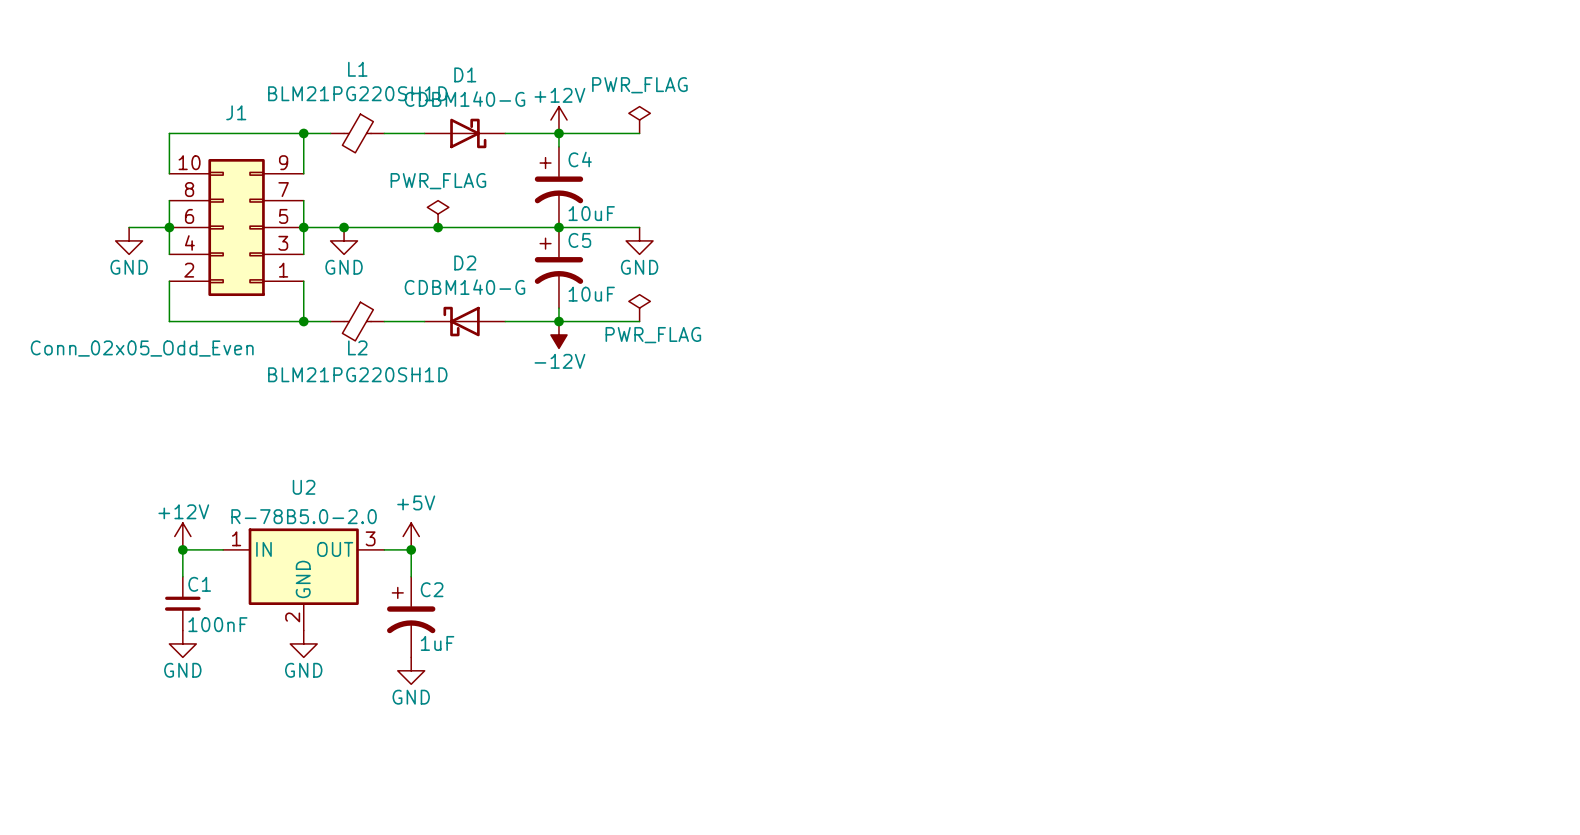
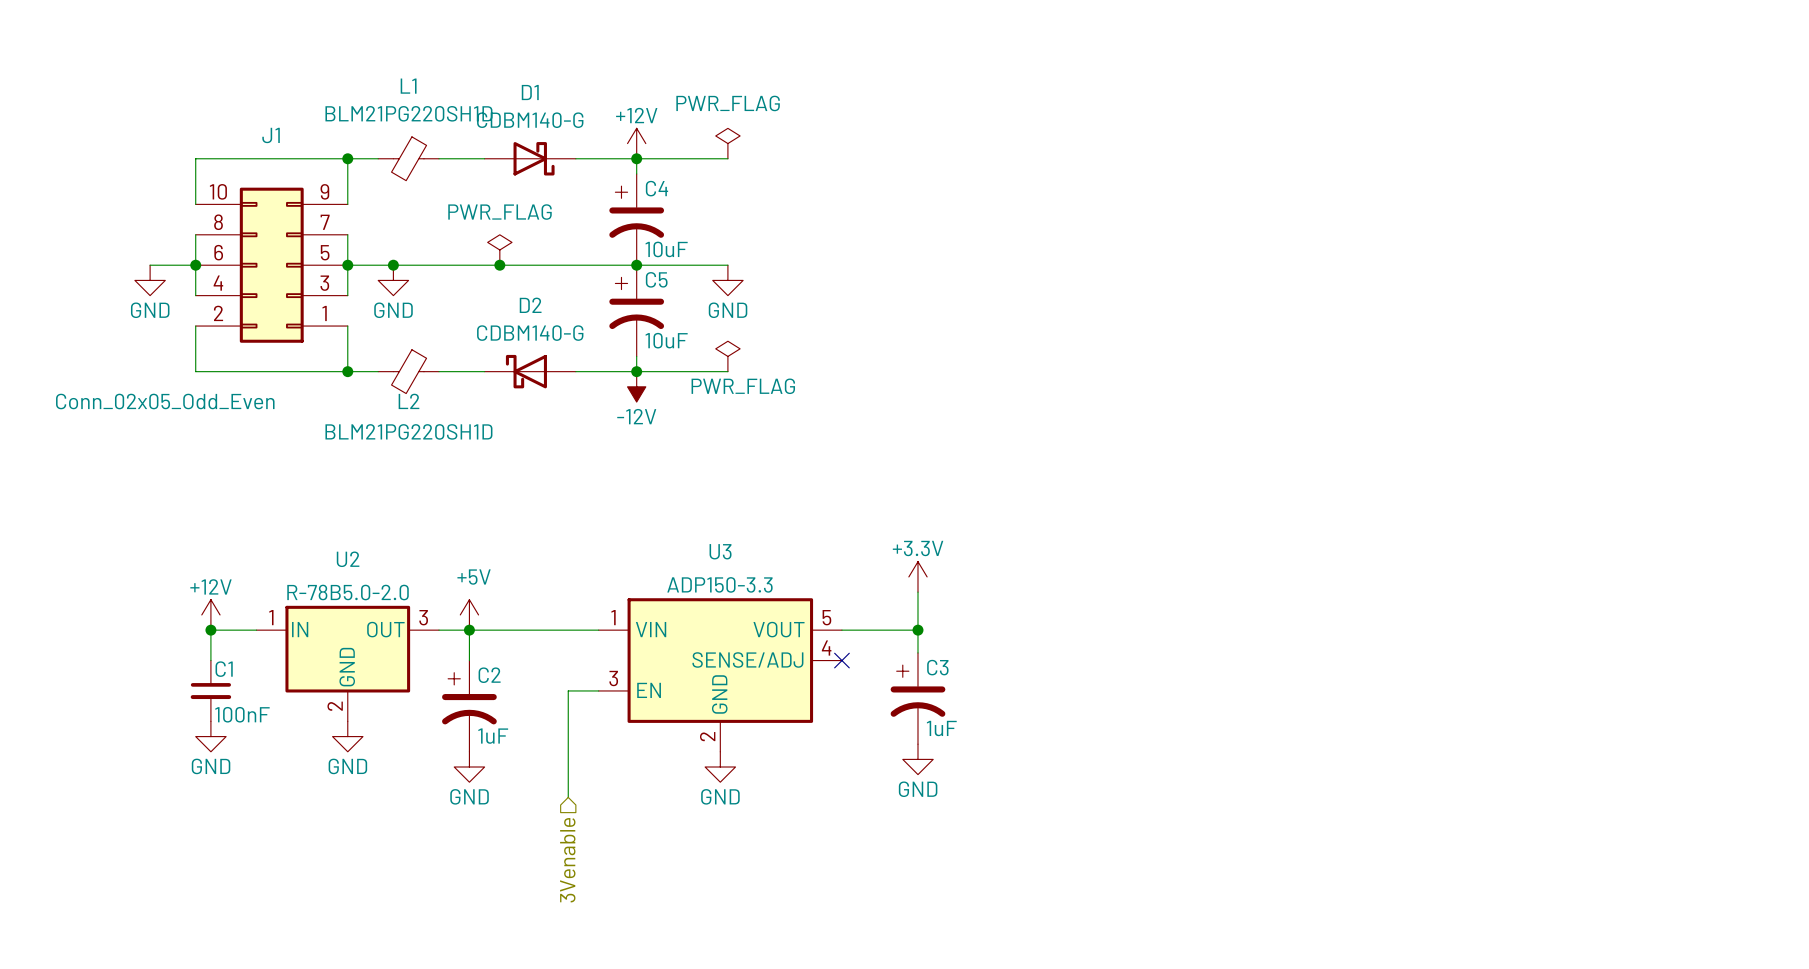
power symbol: none -> +3.3V (917, 576)
wire: none -> (917, 592) (917, 652)
wire: none -> (469, 630) (598, 630)
wire: none -> (841, 630) (917, 630)
junction: none -> (917, 630)
no-connect mark: none -> (841, 660)
U3: none -> ADP150-3.3 (720, 675)
wire: none -> (598, 690) (568, 690) (568, 797)
C3: none -> 1uF (917, 698)
power symbol: none -> GND (917, 759)
power symbol: none -> GND (720, 767)
hierarchical label: none -> 3Venable (567, 860)

